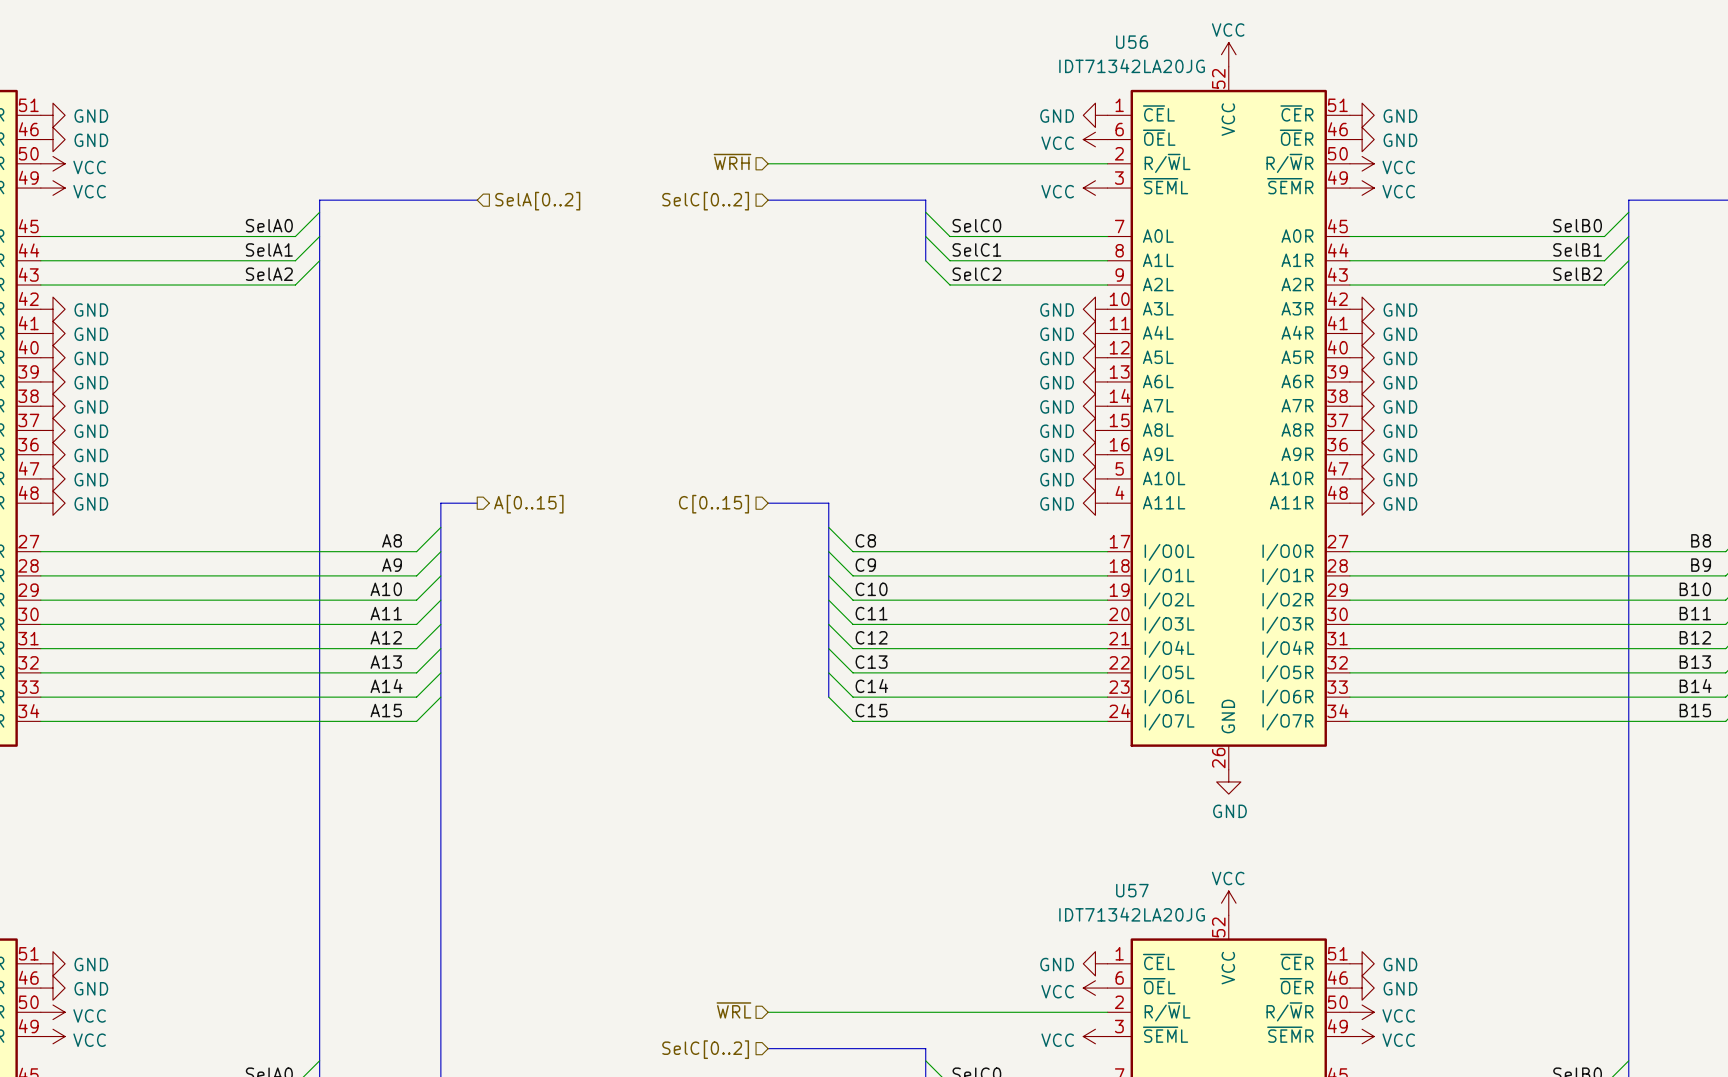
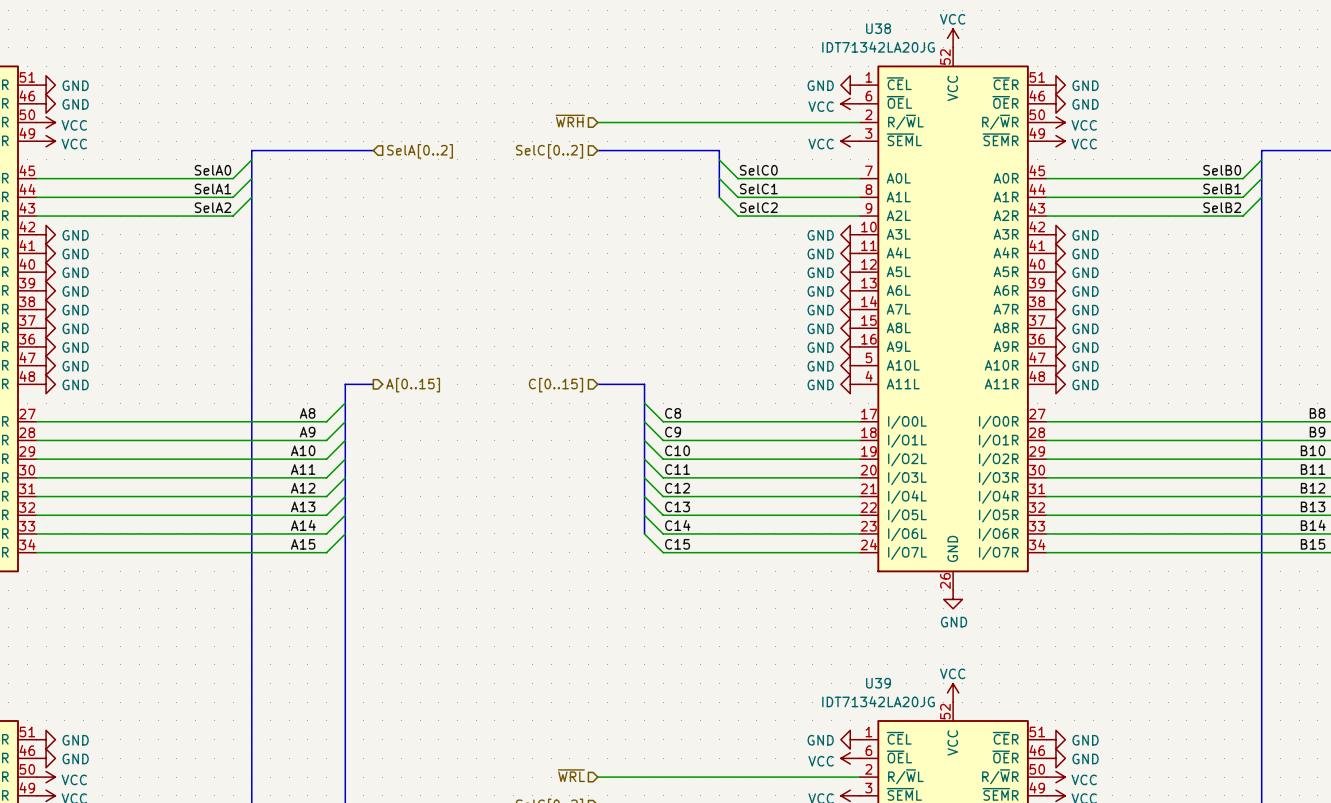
U56 name: U56 (1132, 42) -> U38 (878, 28)
U57 name: U57 (1132, 890) -> U39 (878, 683)

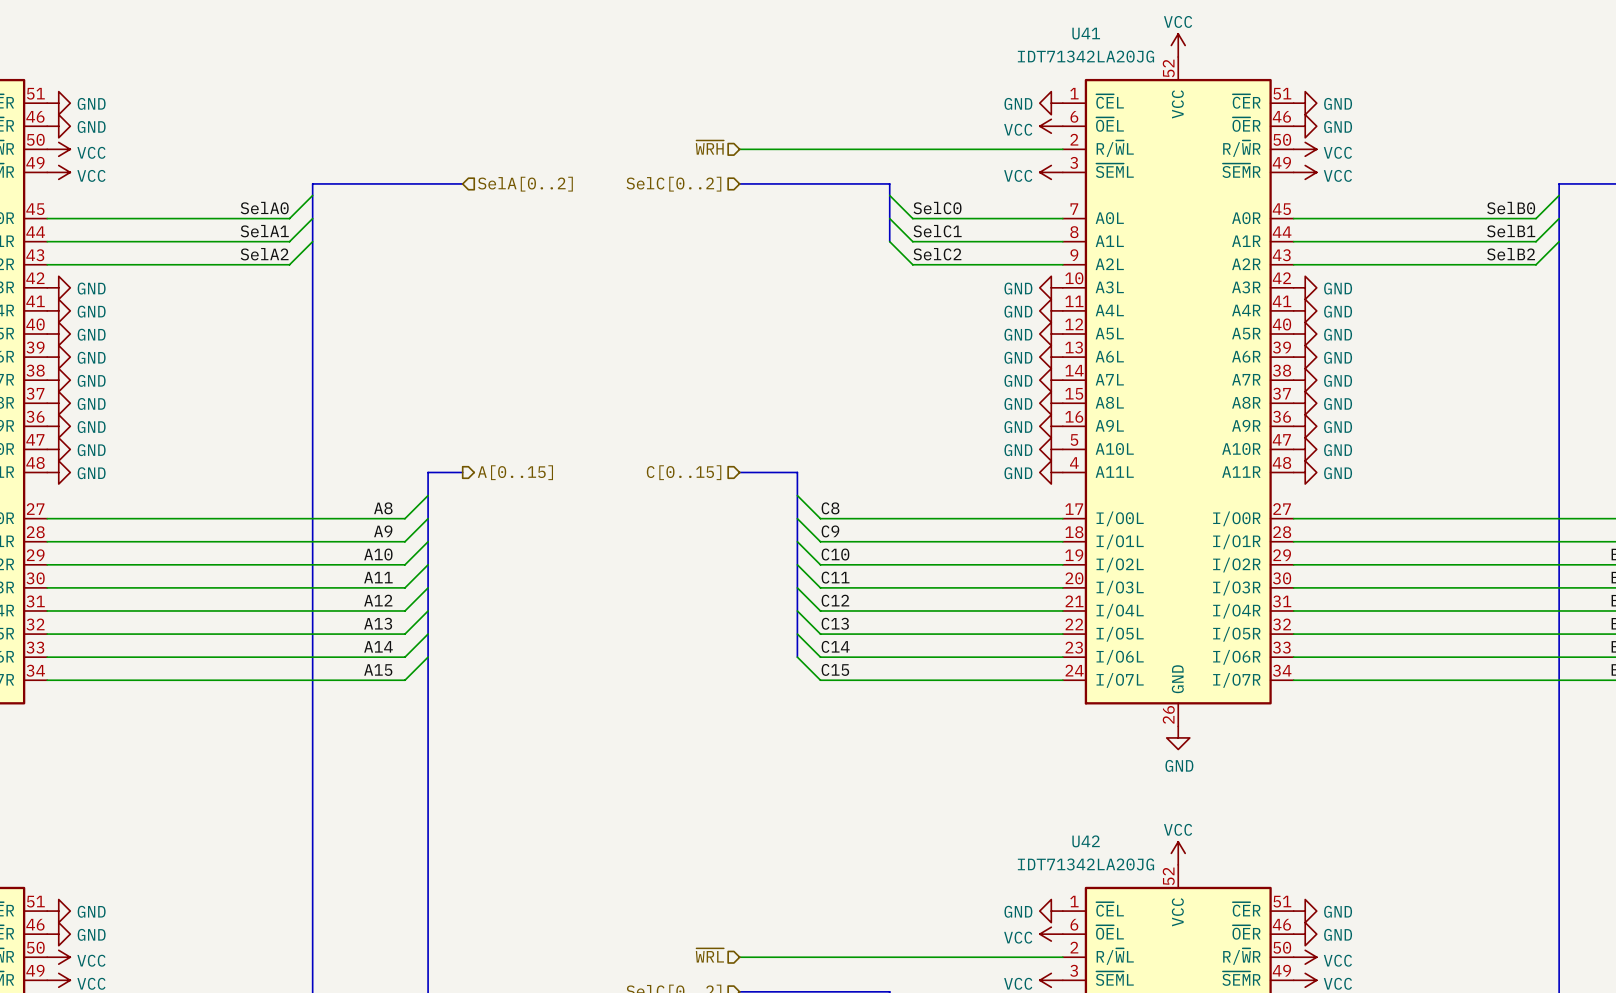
U38 name: U38 (878, 28) -> U41 (1086, 33)
U39 name: U39 (878, 683) -> U42 (1086, 841)

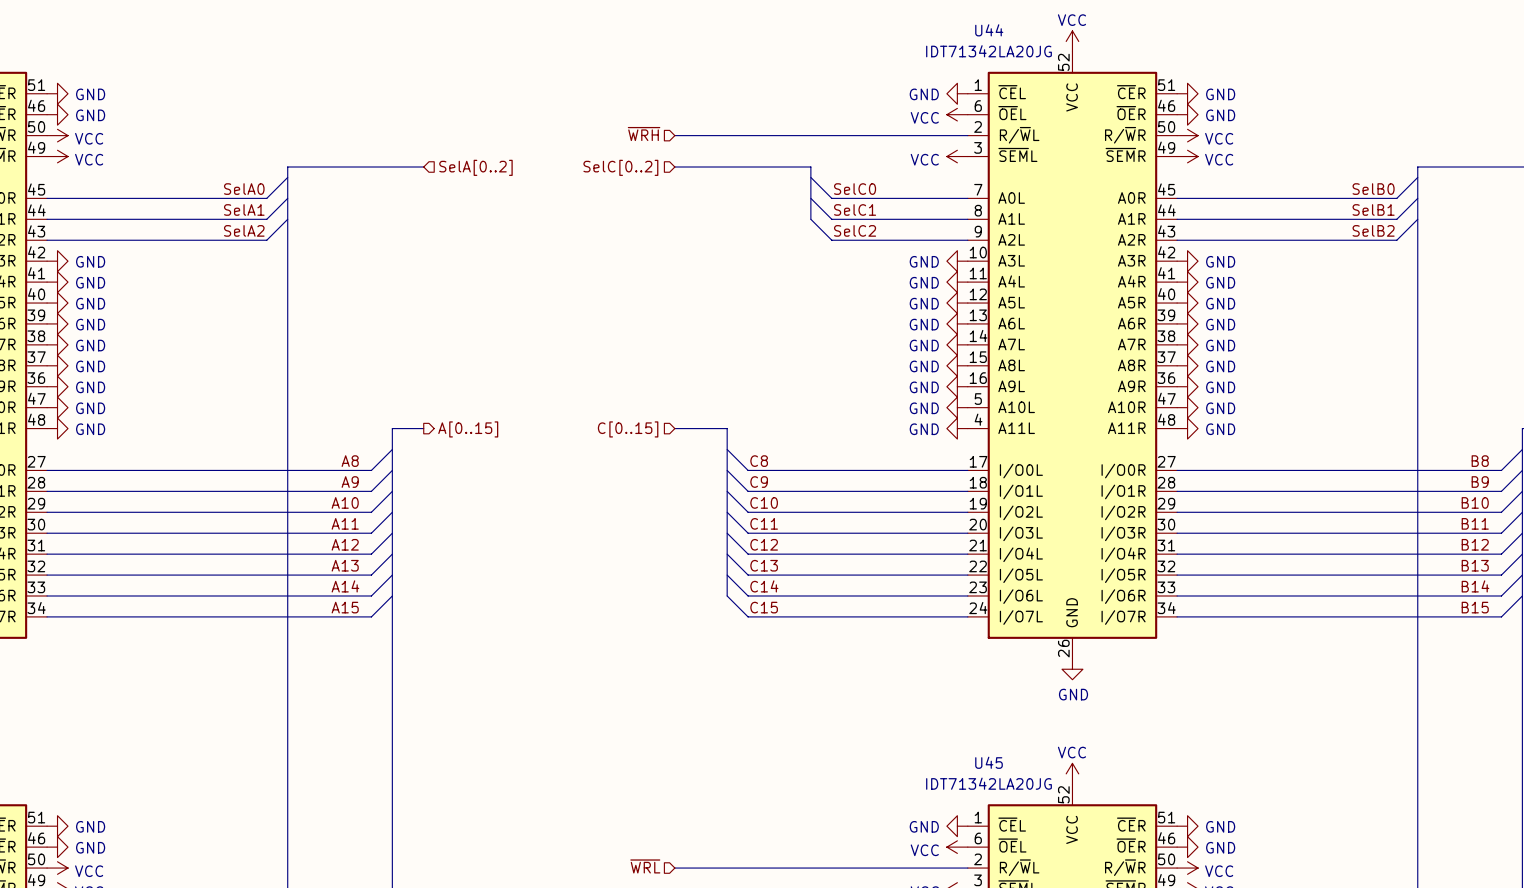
U41 name: U41 (1086, 33) -> U44 (989, 30)
U42 name: U42 (1086, 841) -> U45 (989, 762)

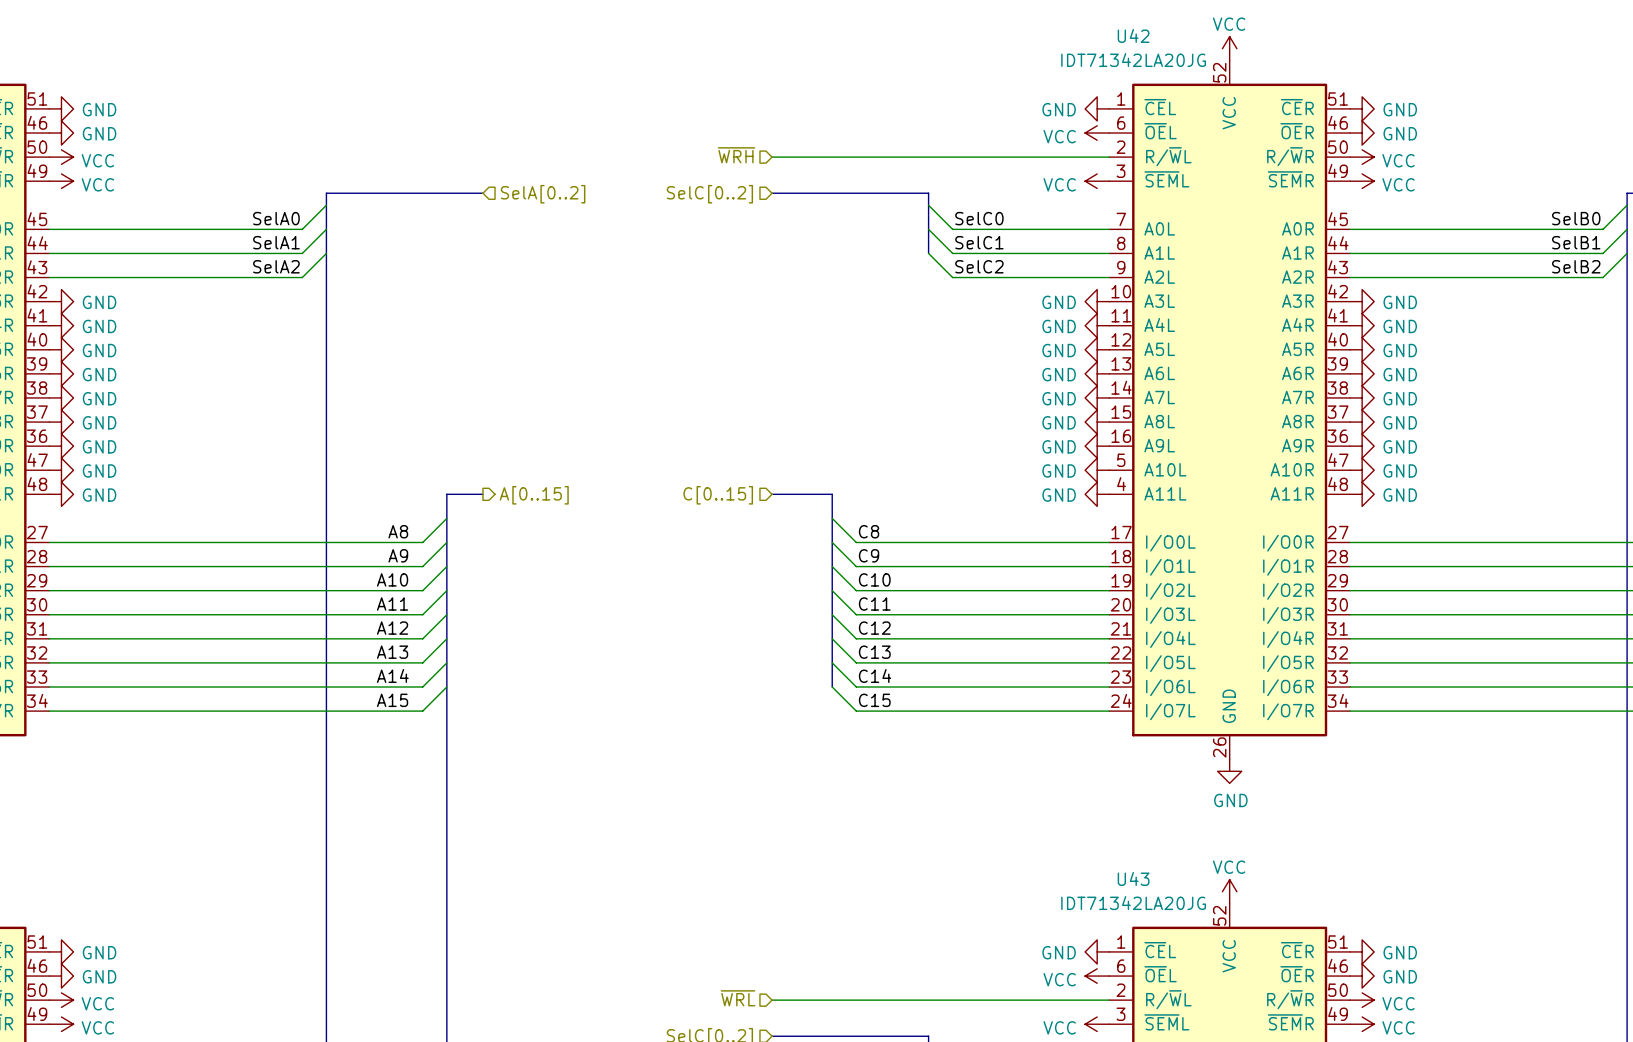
U44 name: U44 (989, 30) -> U42 (1133, 35)
U45 name: U45 (989, 762) -> U43 (1133, 878)

